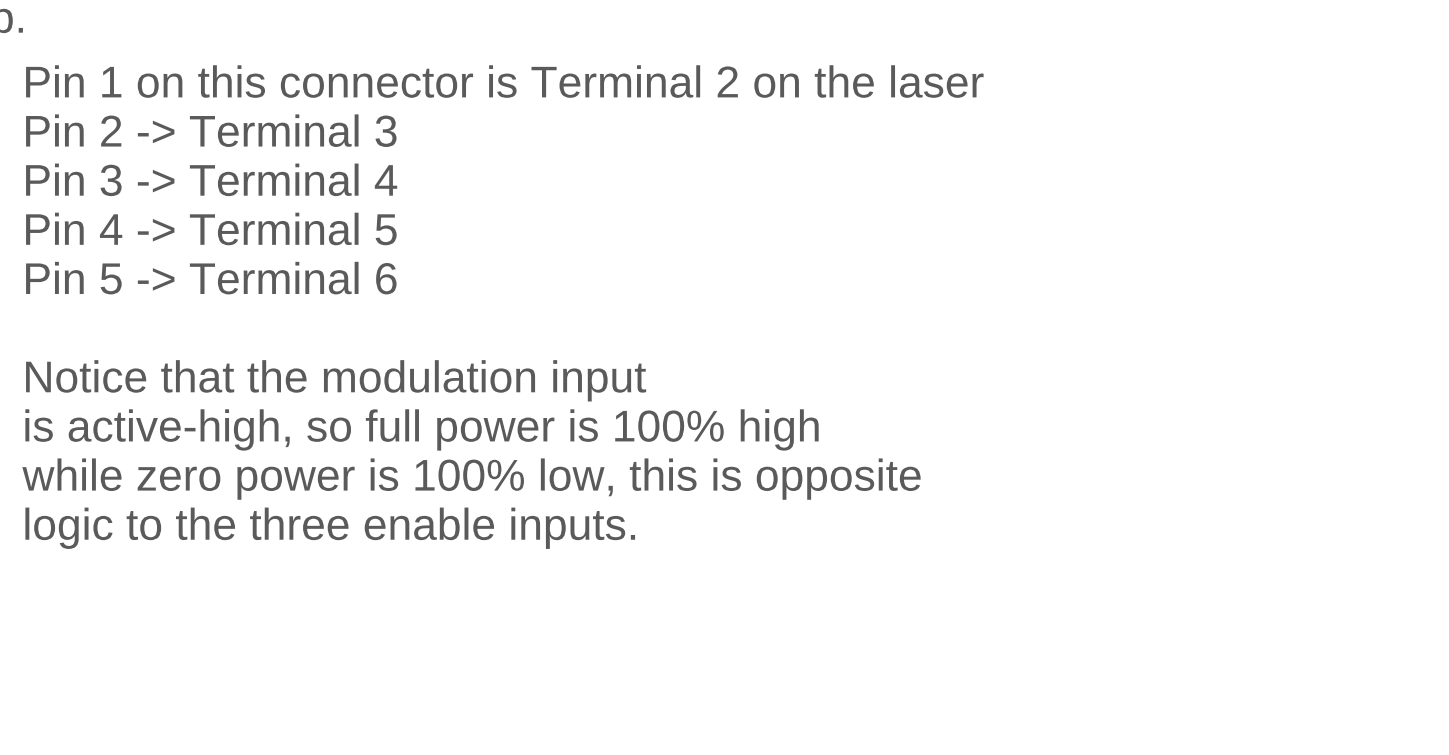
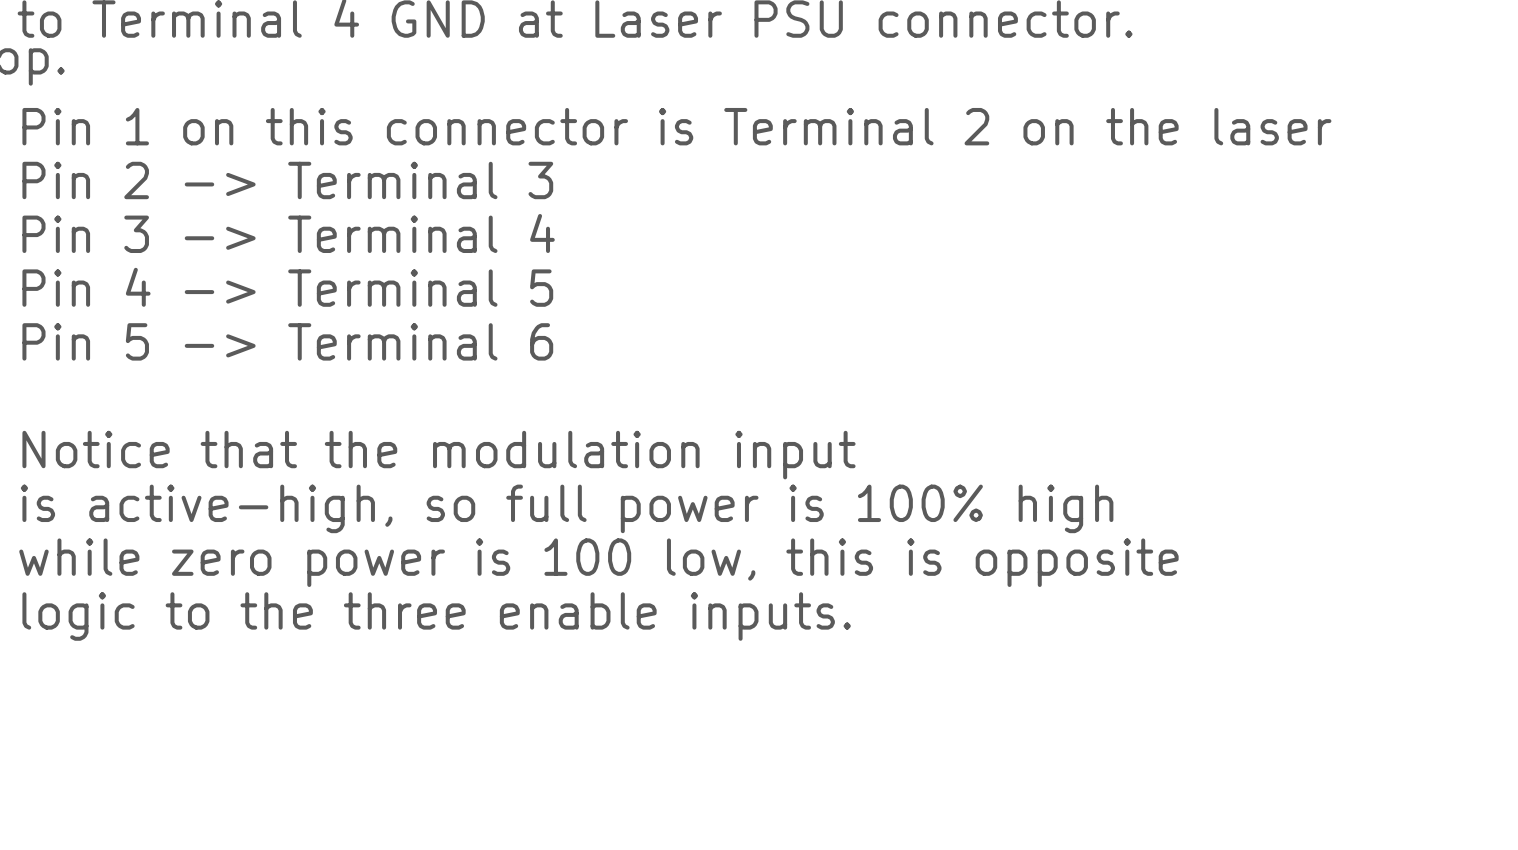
text: while zero power is 100% low, this is opposite (471, 479) -> while zero power is 100 low, this is opposite (598, 562)

